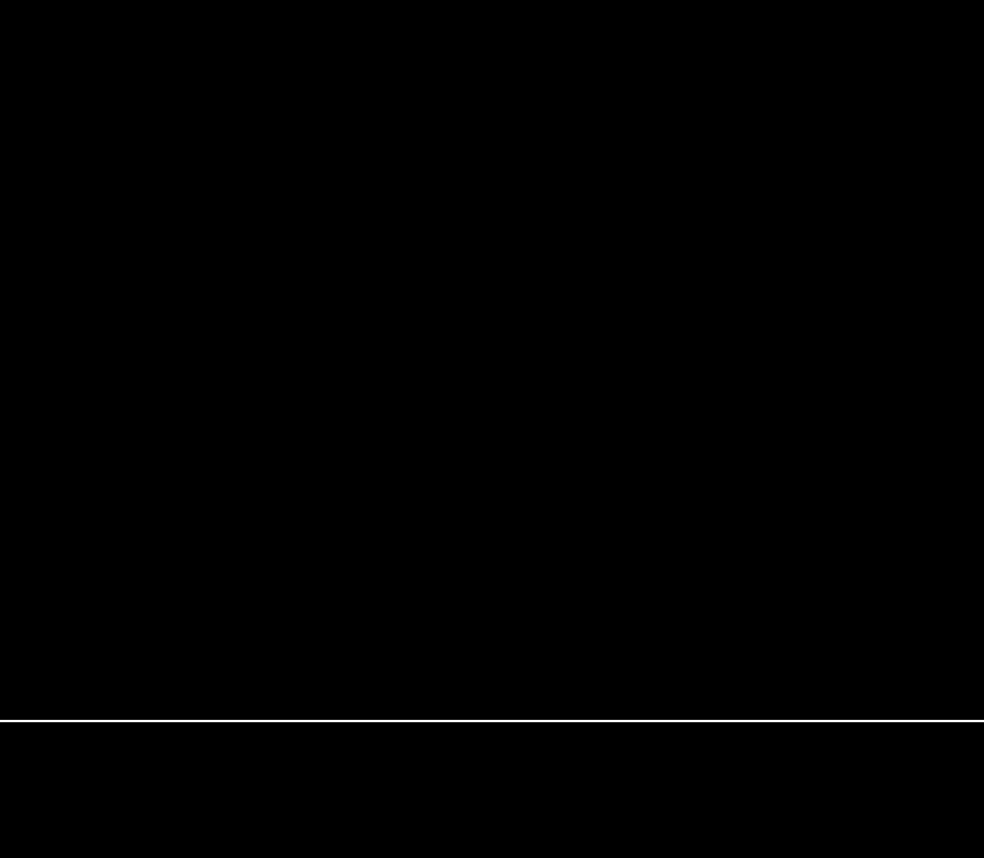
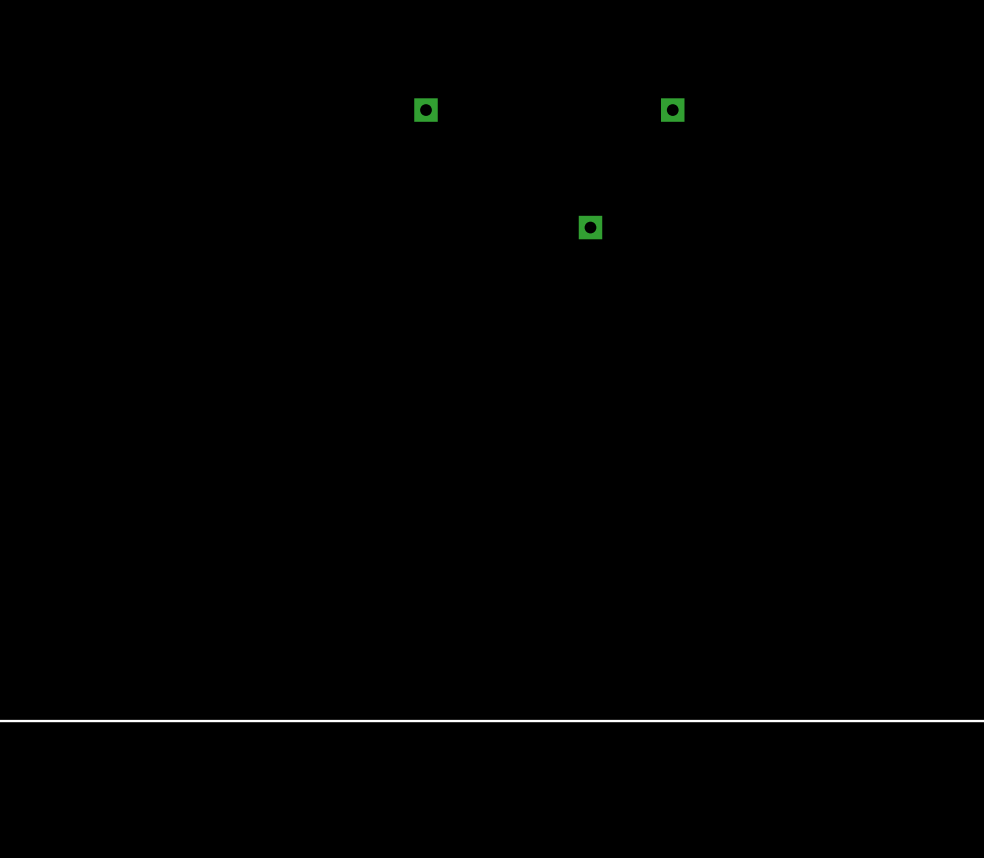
part: none -> (425, 110)
part: none -> (672, 110)
part: none -> (590, 227)

